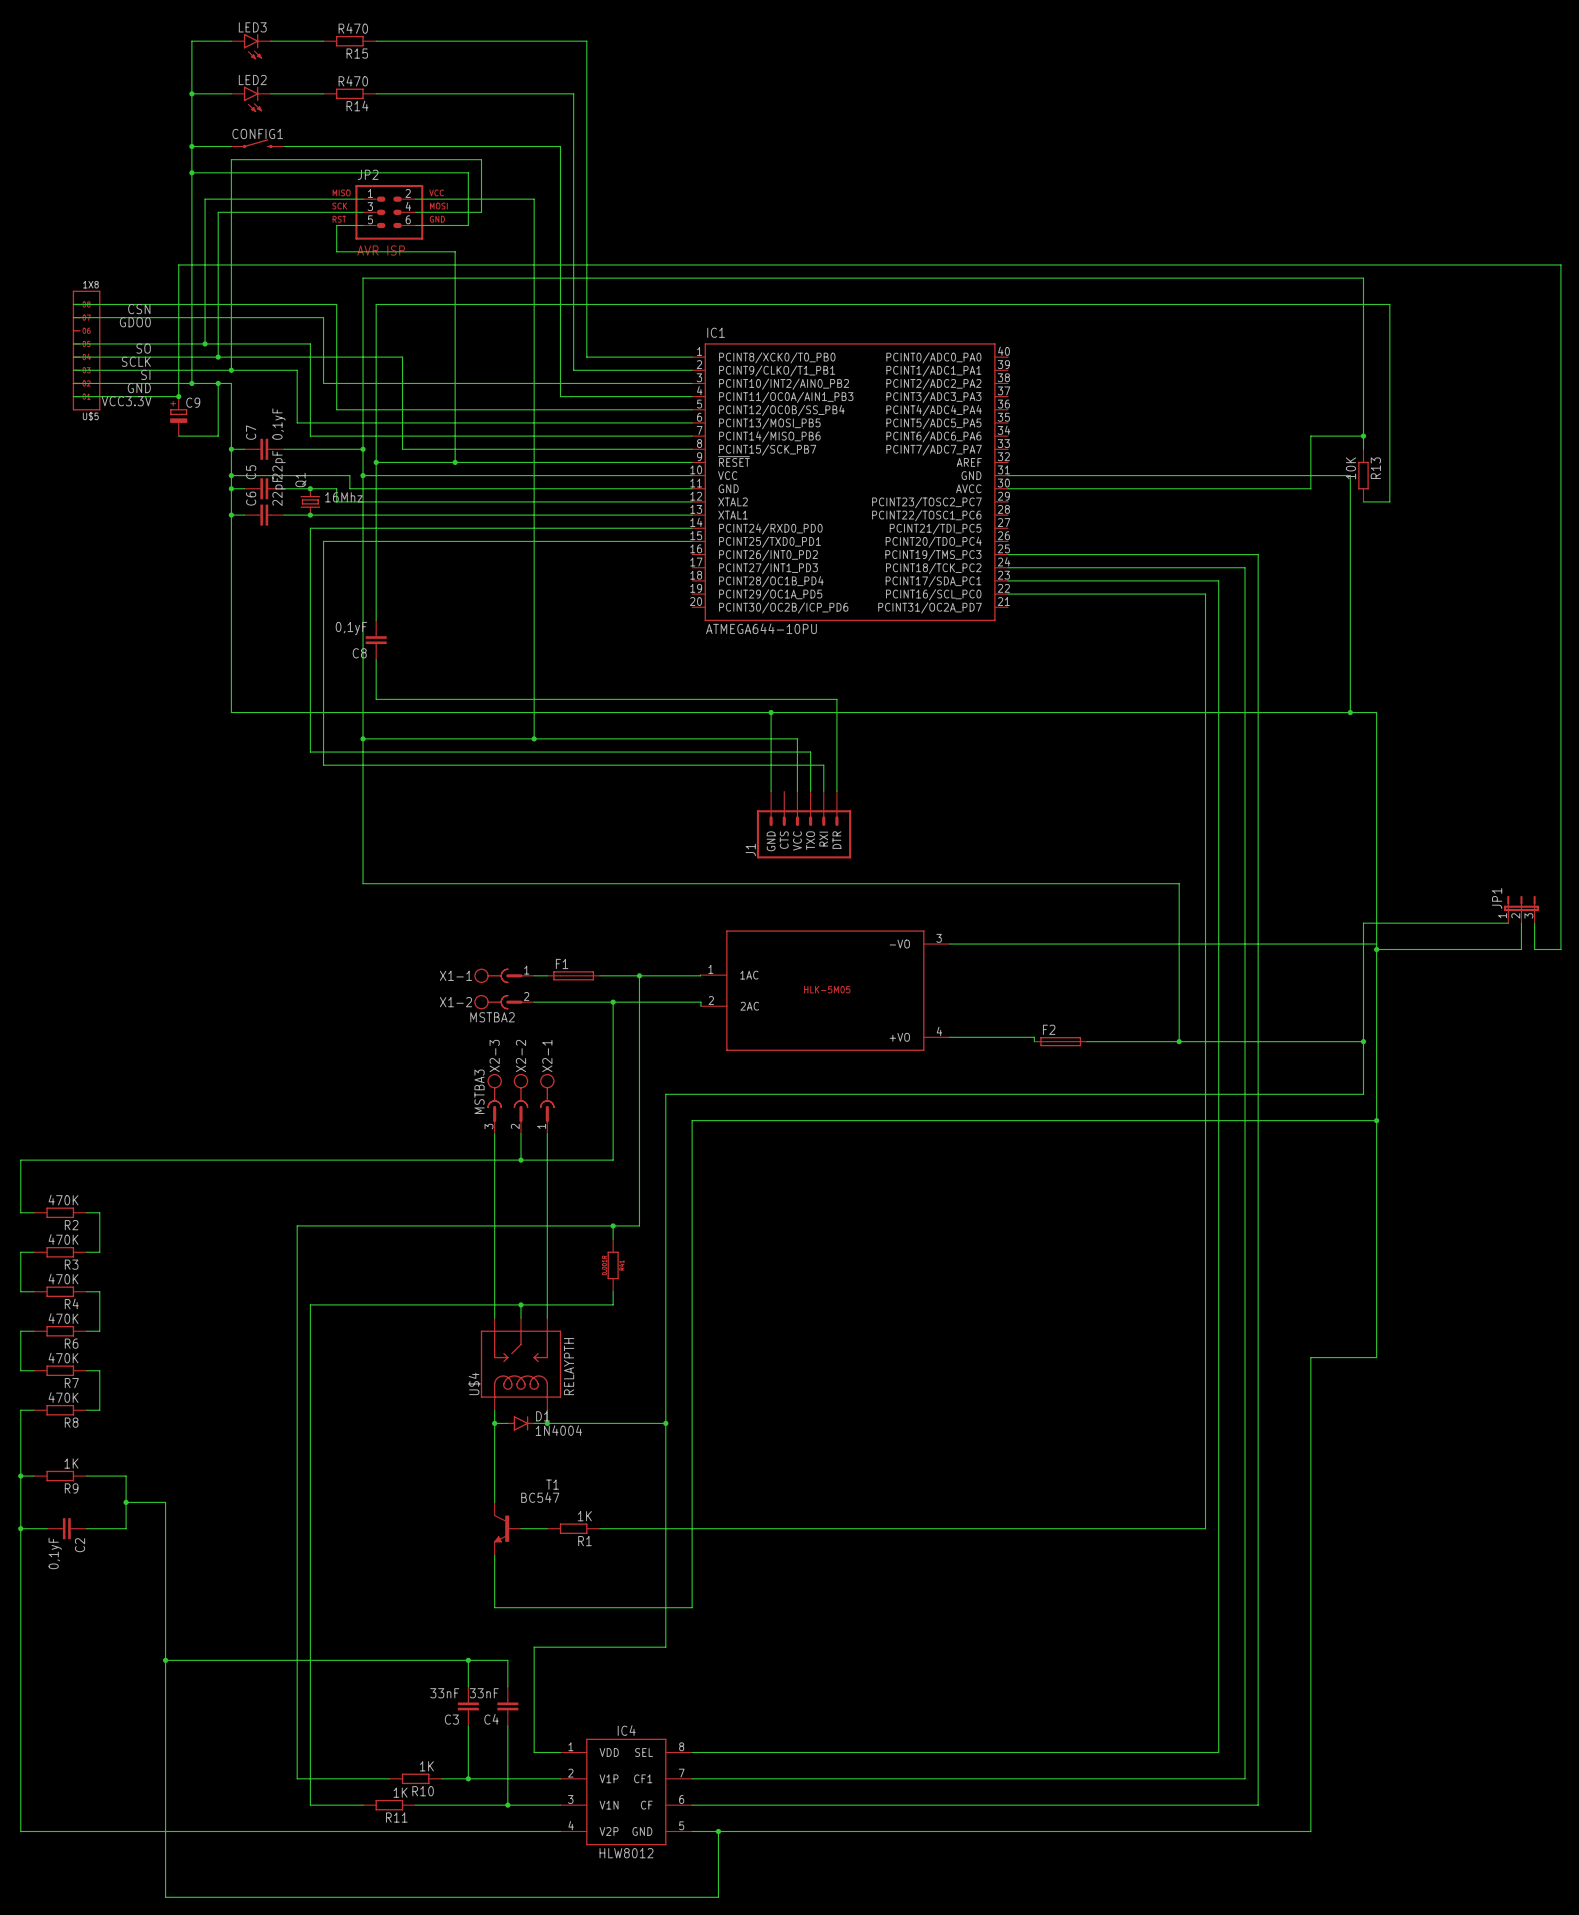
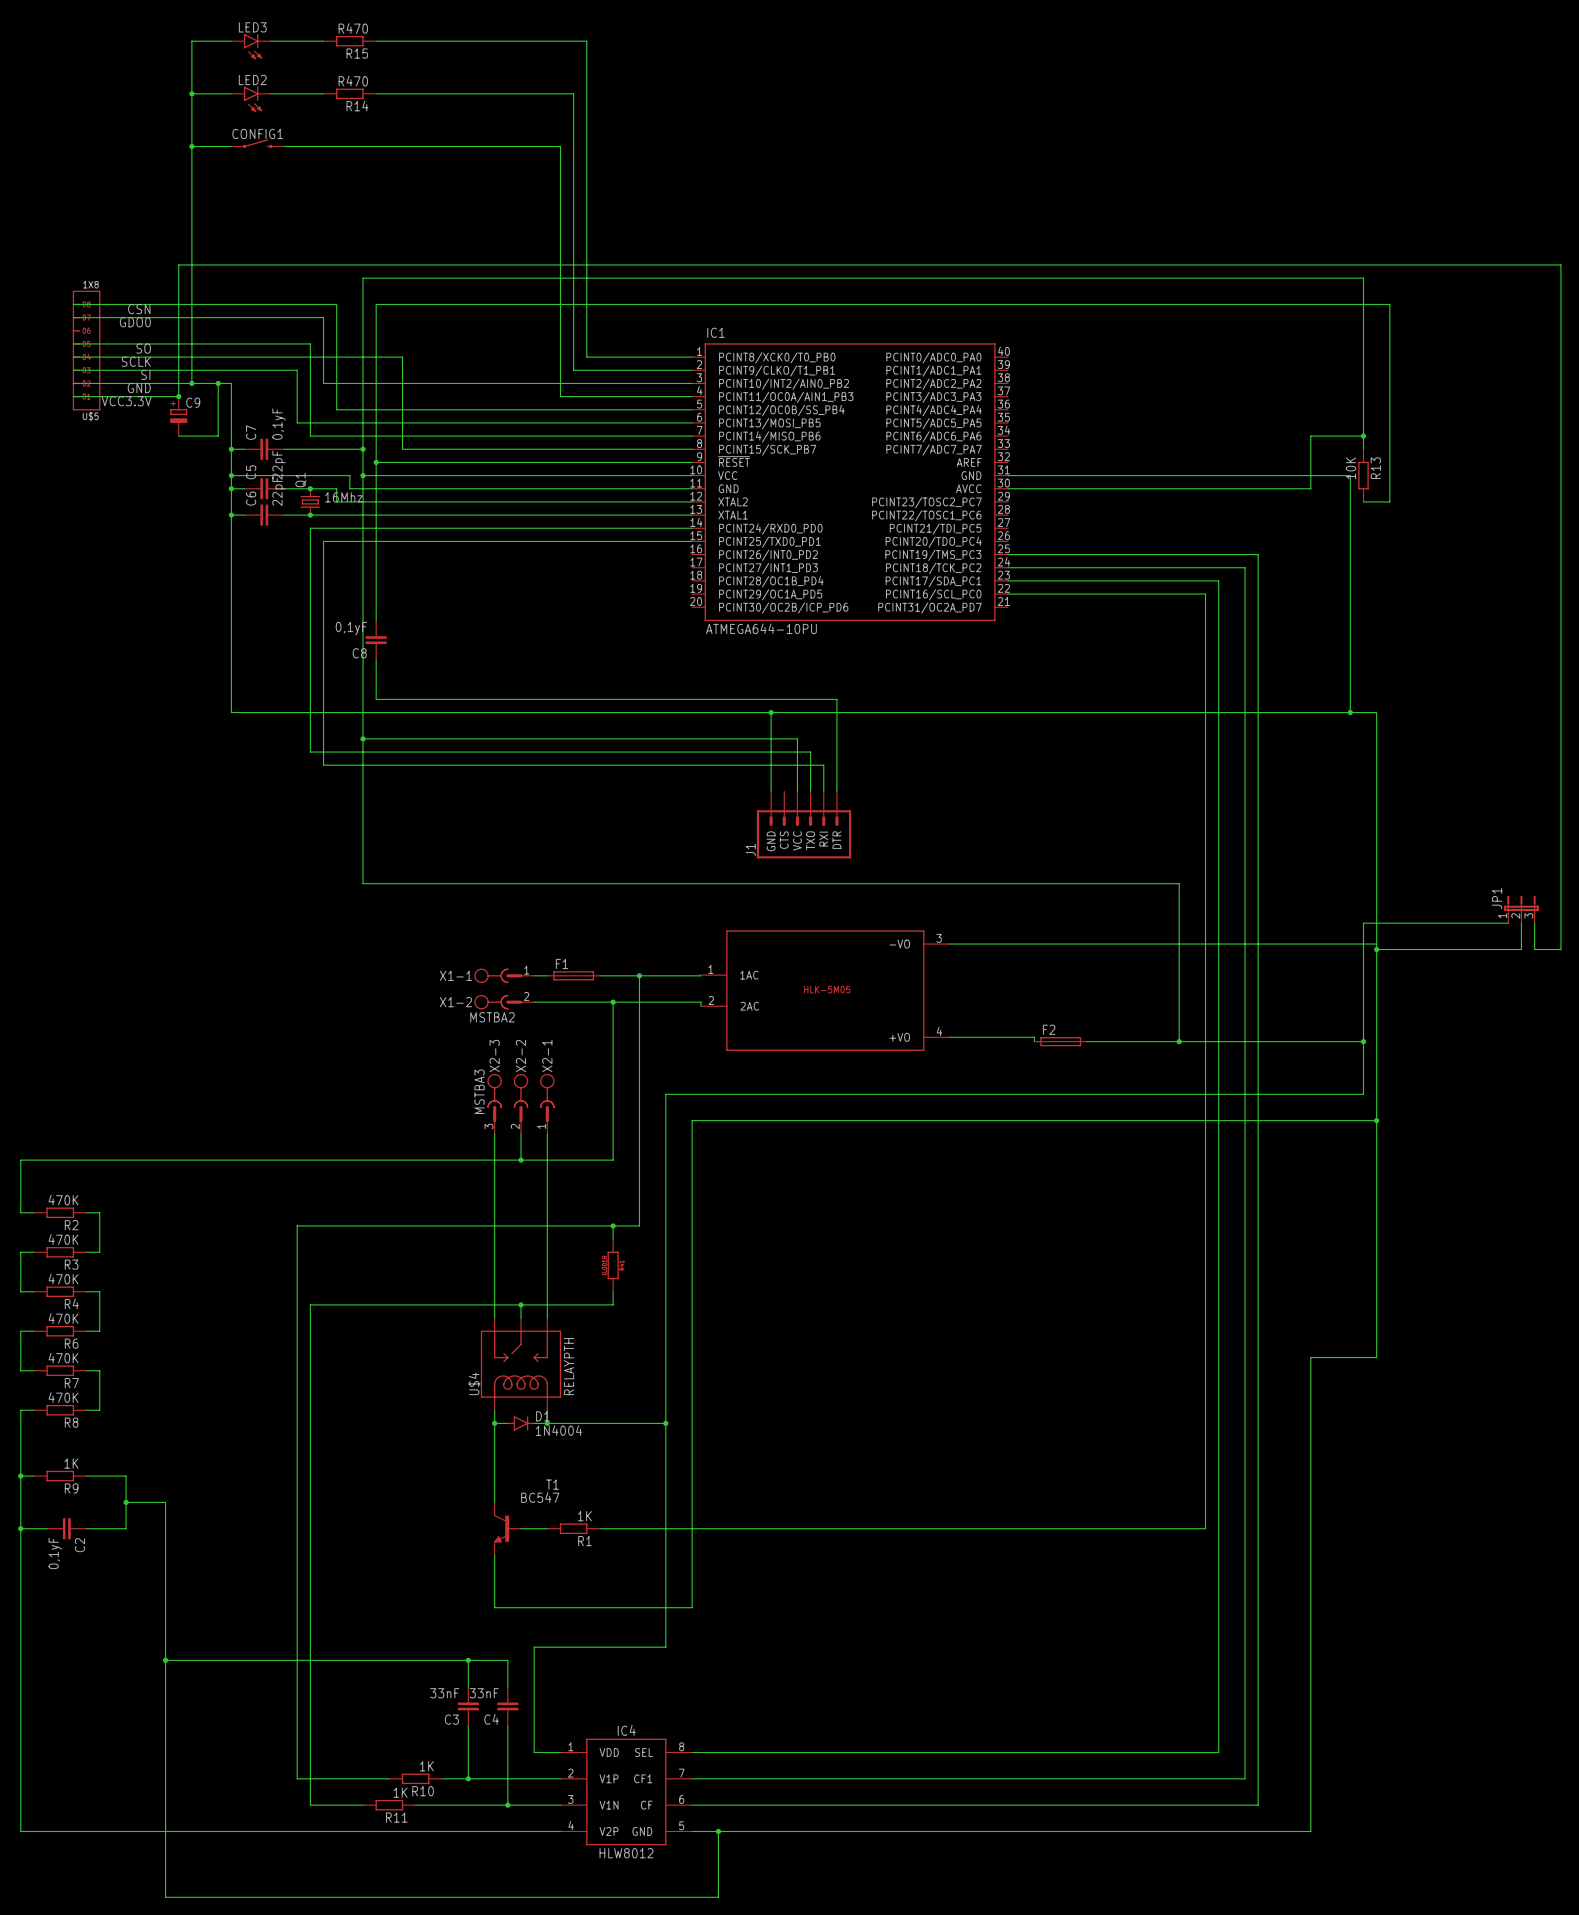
wire: (191, 172) (468, 172) (468, 225) (415, 225) -> none
junction: (191, 172) -> none
wire: (363, 199) (205, 199) (205, 343) -> none
wire: (415, 199) (534, 199) (534, 738) -> none
wire: (363, 212) (218, 212) (218, 357) -> none
JP2: (389, 212) -> none
wire: (415, 212) (481, 212) (481, 159) (231, 159) (231, 370) -> none
wire: (363, 225) (336, 225) (336, 251) (455, 251) (455, 462) -> none
junction: (205, 343) -> none
junction: (218, 357) -> none
junction: (231, 370) -> none
junction: (455, 462) -> none
junction: (534, 738) -> none

